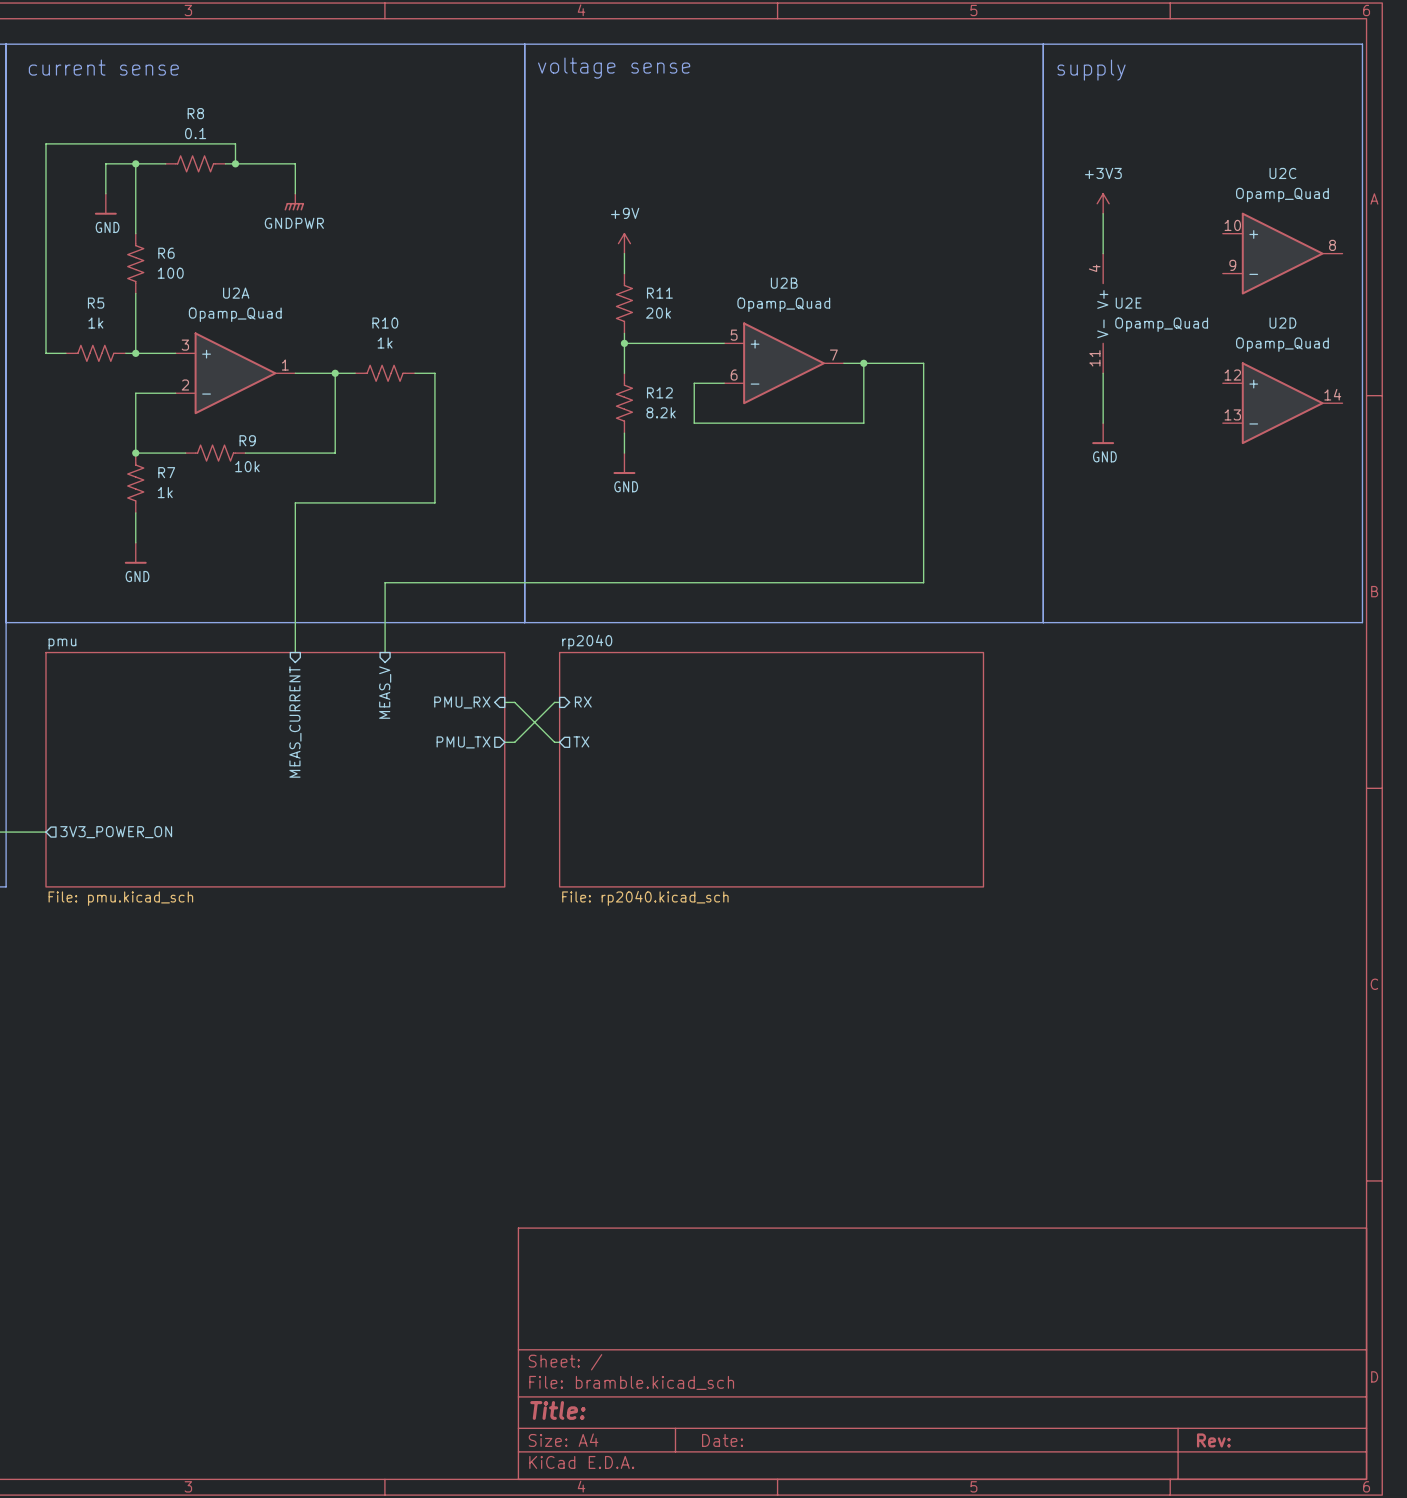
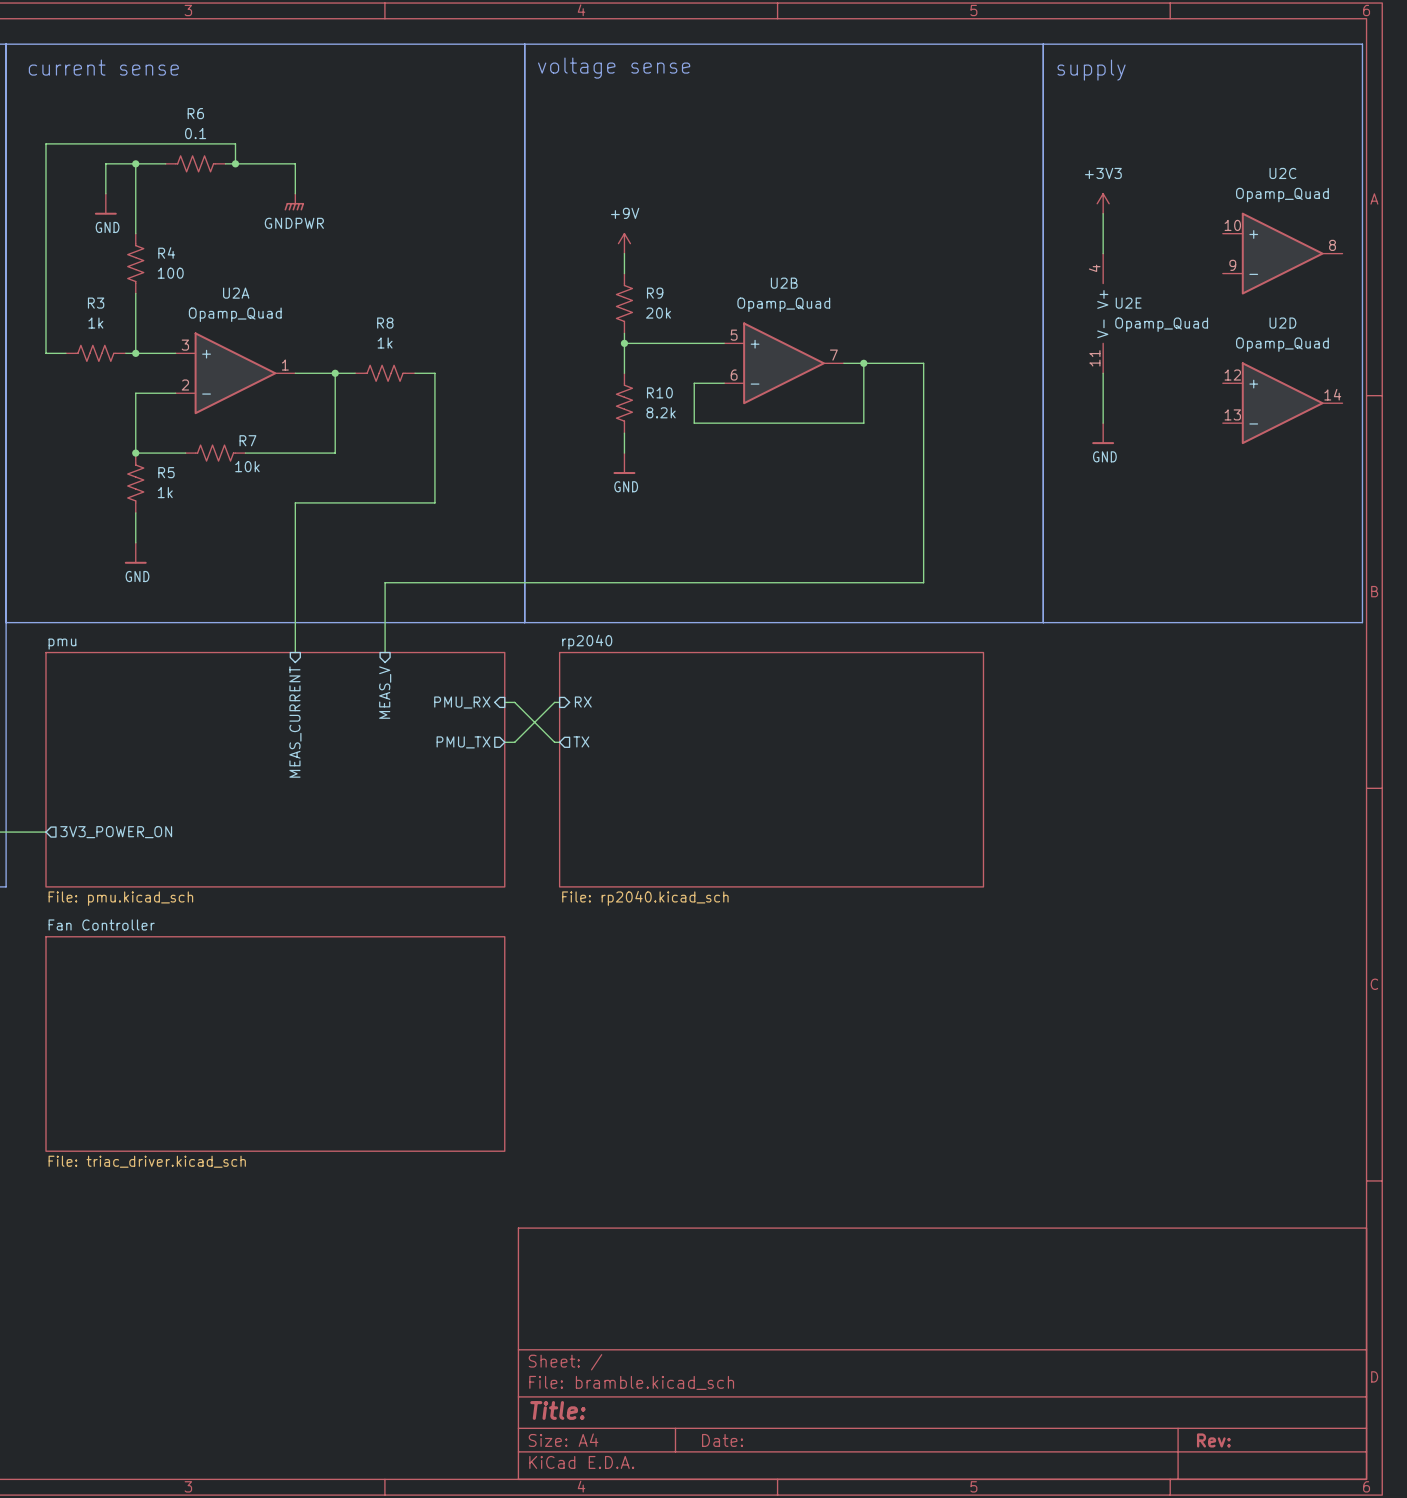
R8 name: R8 (195, 113) -> R6 (195, 113)
R6 name: R6 (166, 253) -> R4 (166, 253)
R11 name: R11 (659, 293) -> R9 (655, 293)
R5 name: R5 (96, 303) -> R3 (96, 303)
R10 name: R10 (385, 323) -> R8 (385, 323)
R12 name: R12 (659, 392) -> R10 (659, 392)
R9 name: R9 (247, 440) -> R7 (247, 440)
R7 name: R7 (166, 472) -> R5 (166, 472)
sheet Fan Controller: none -> File: triac_driver.kicad_sch (275, 1043)

